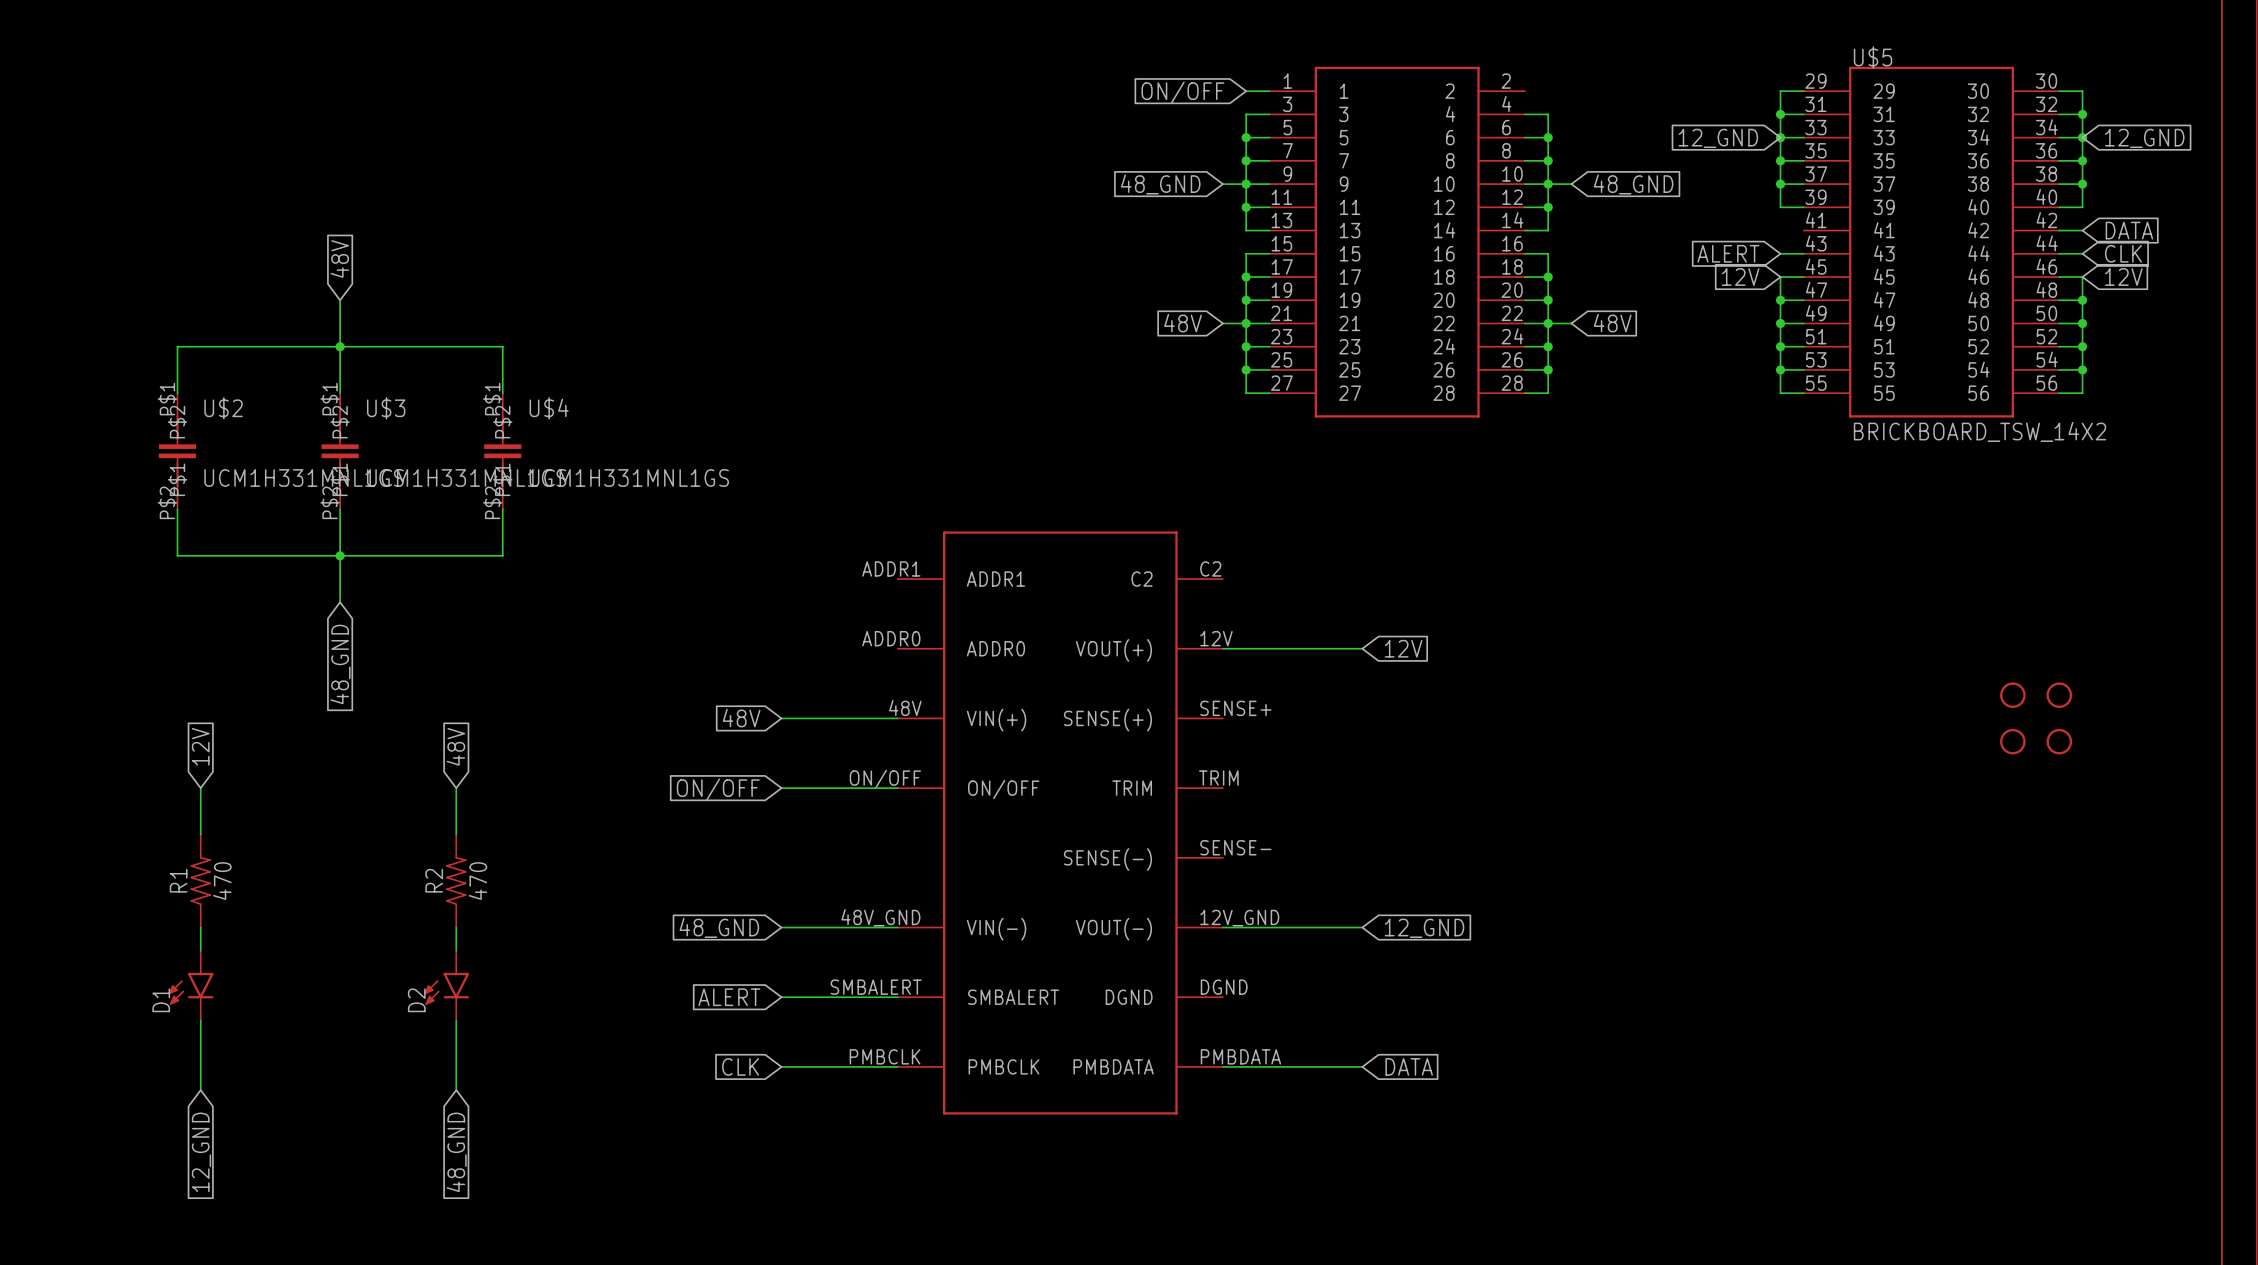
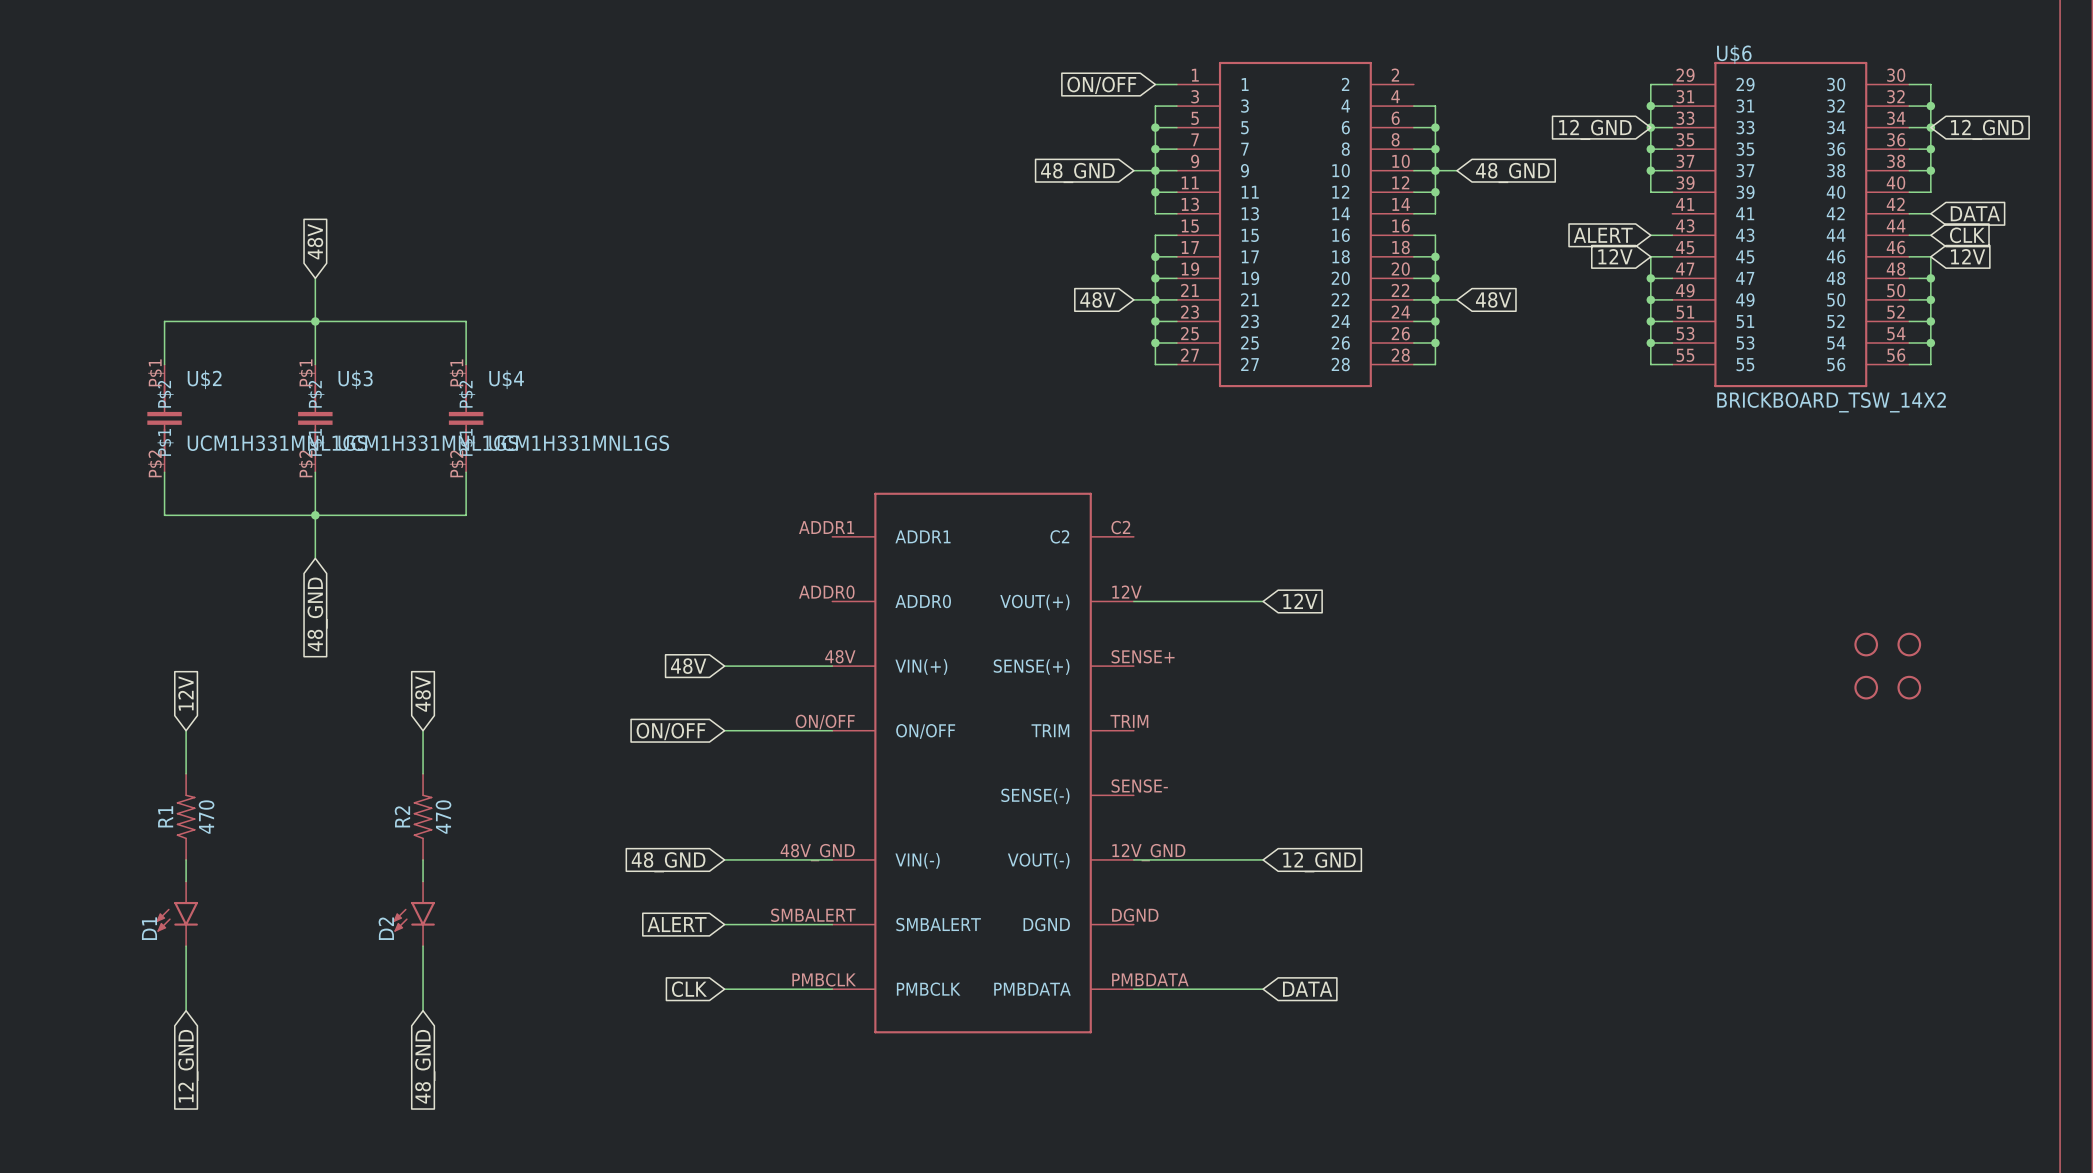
U$5 name: U$5 (1873, 57) -> U$6 (1734, 54)

